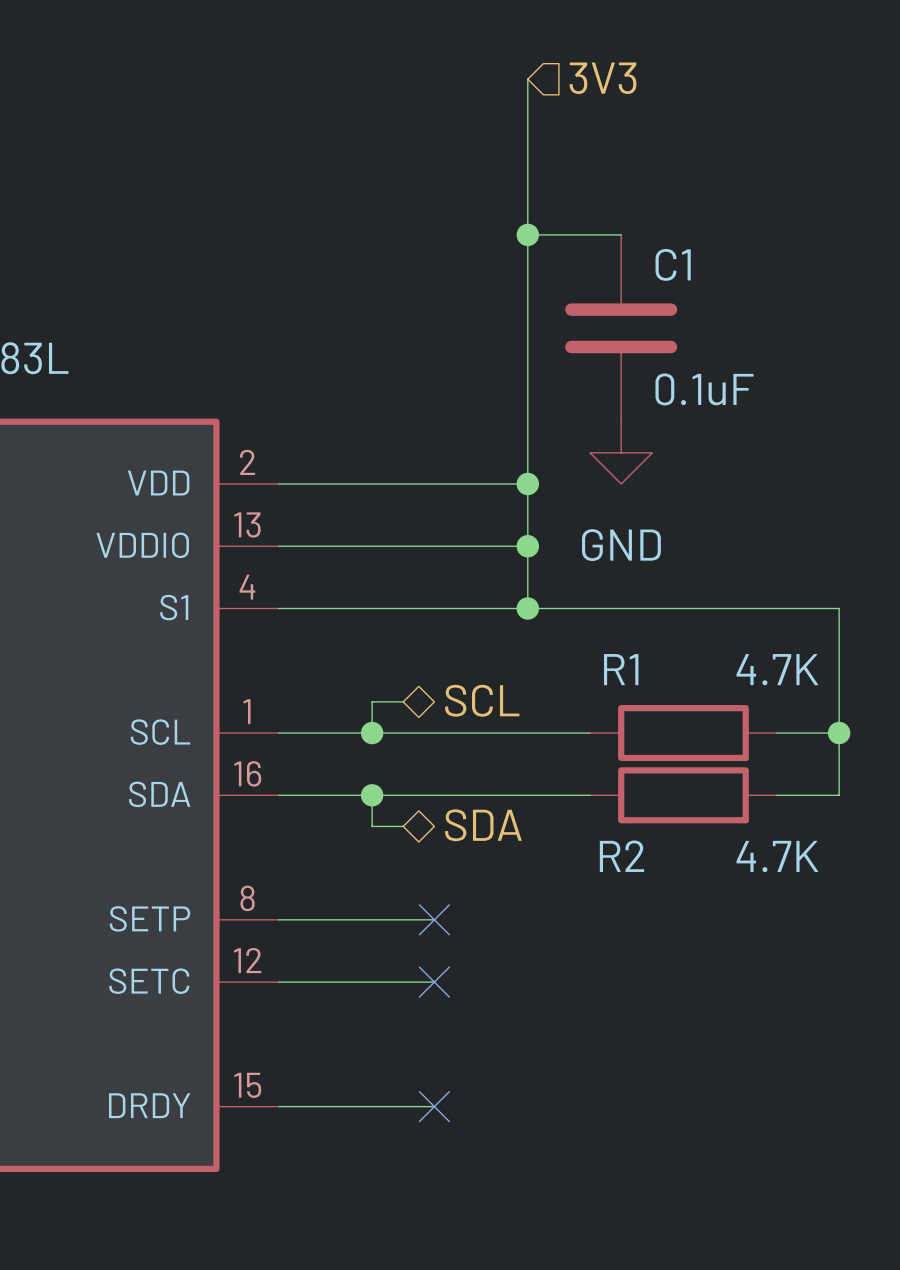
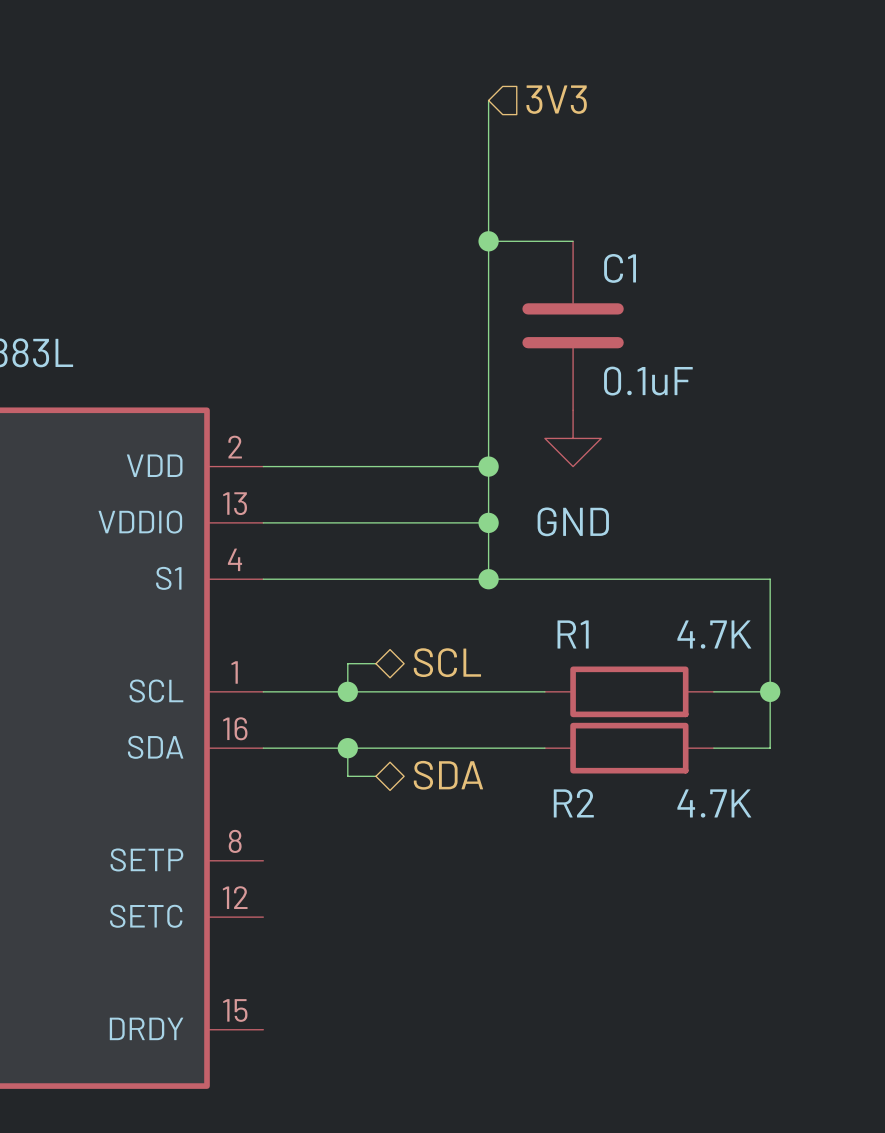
wire: (278, 919) (434, 919) -> none
no-connect mark: (434, 919) -> none
wire: (278, 982) (434, 982) -> none
no-connect mark: (434, 982) -> none
wire: (278, 1106) (434, 1106) -> none
no-connect mark: (434, 1106) -> none

